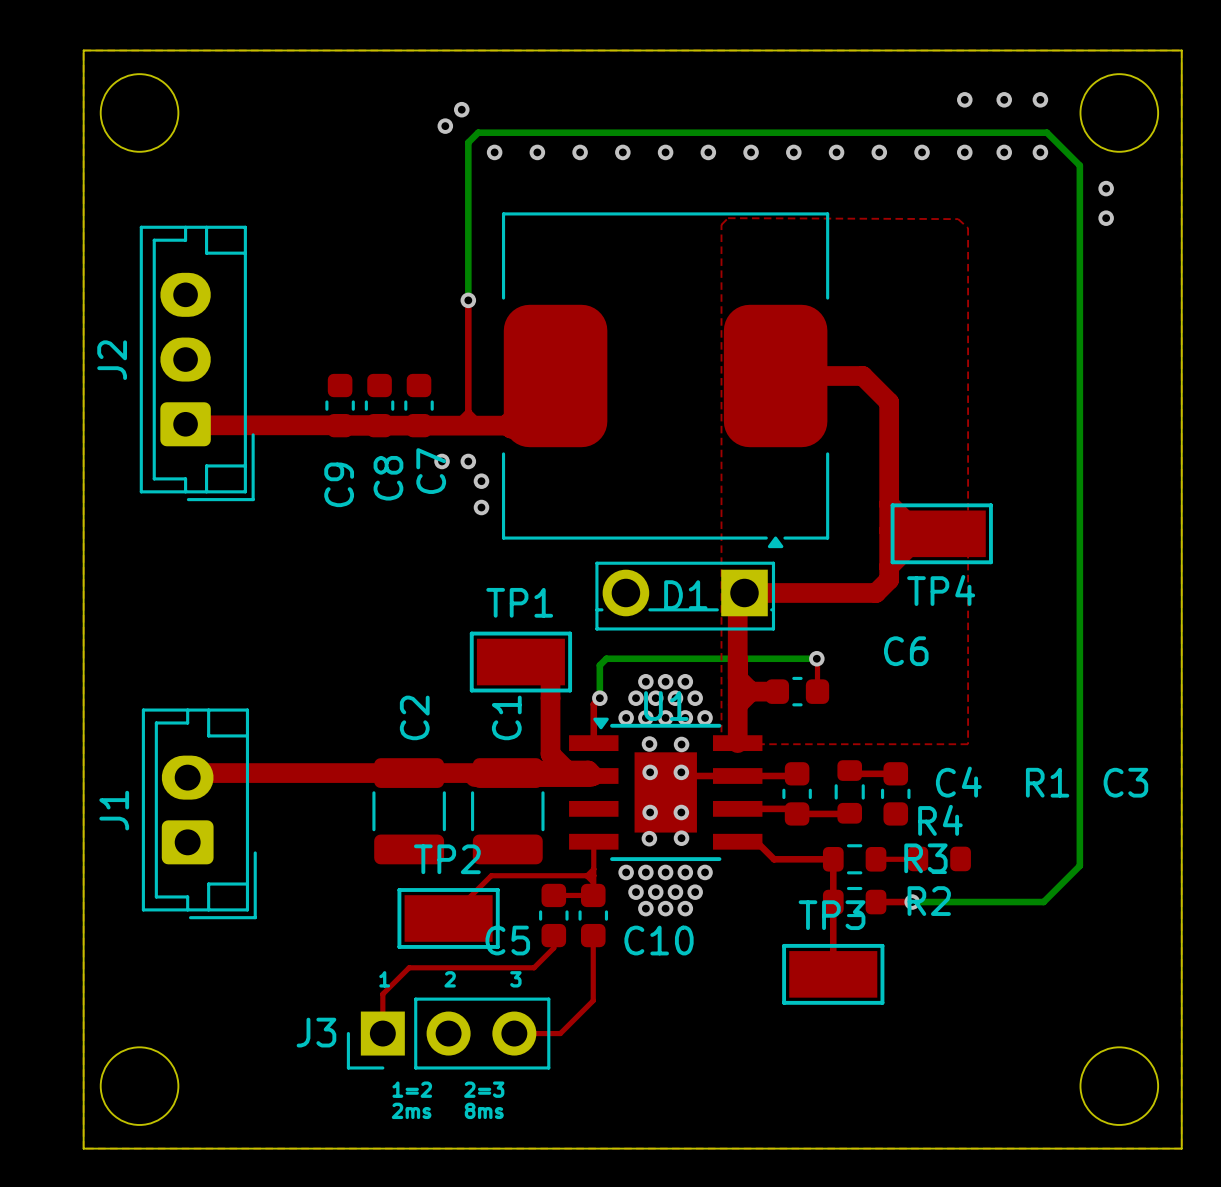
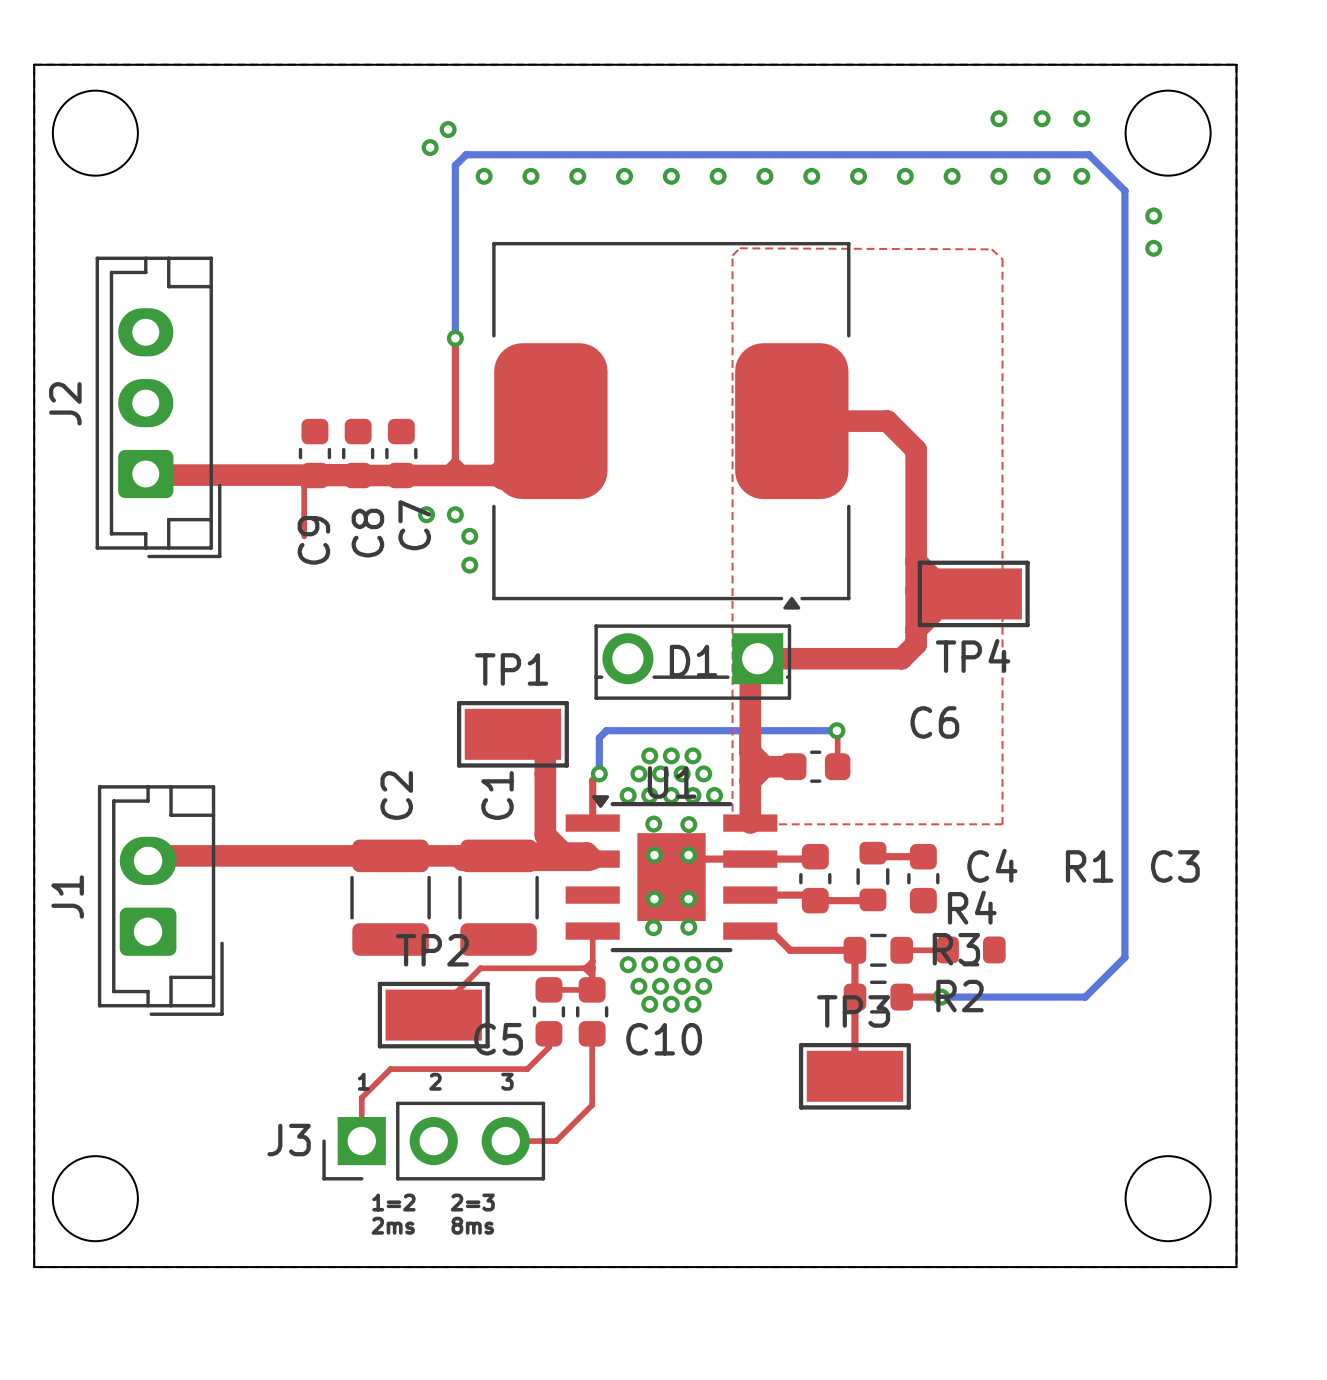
top track: none -> (314, 475) (304, 486) (304, 536)

